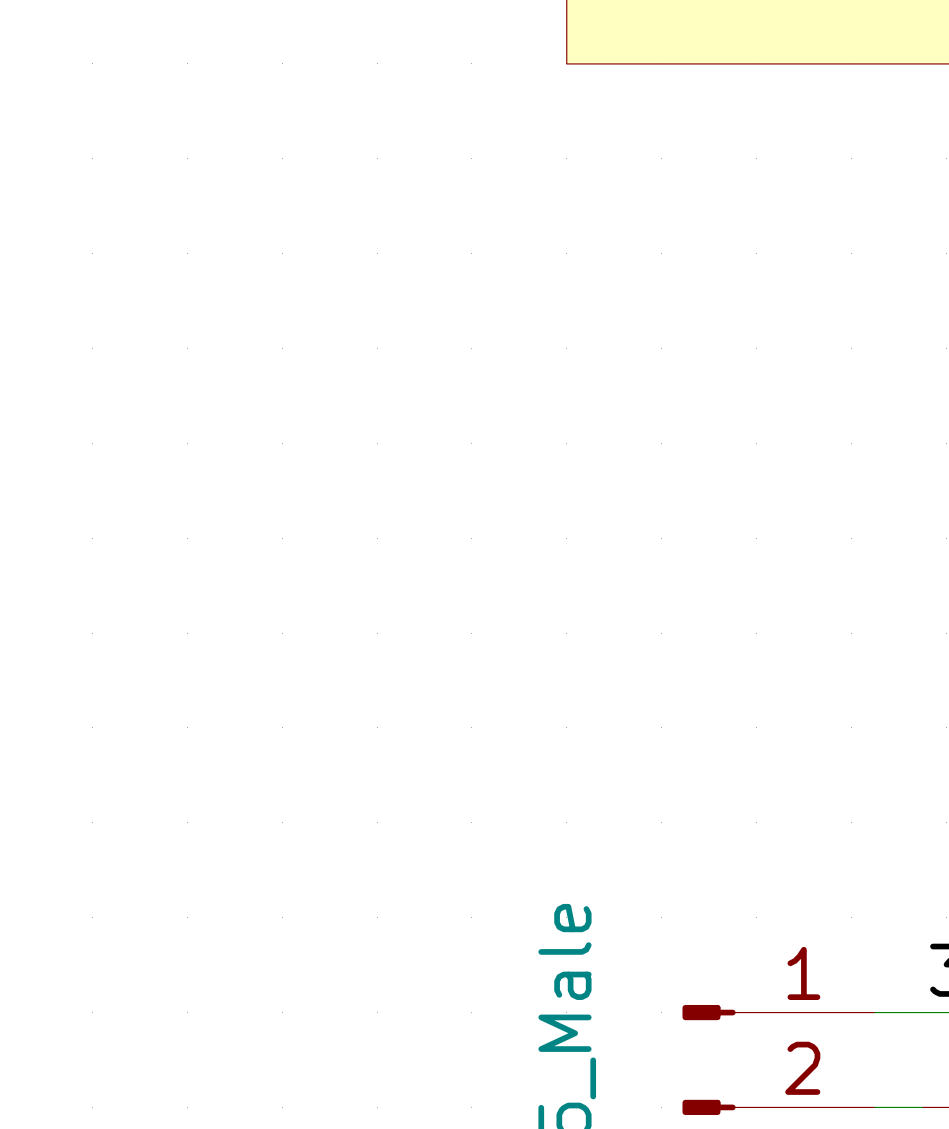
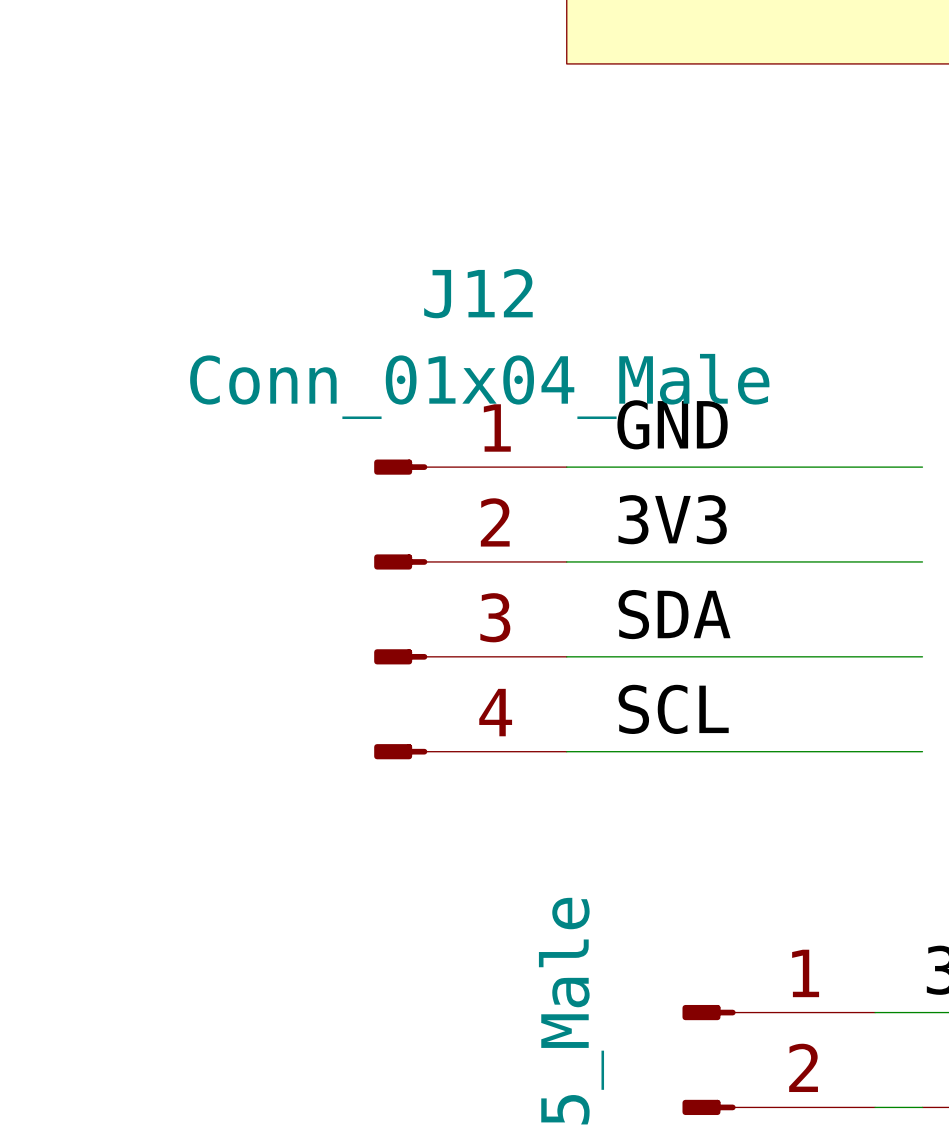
label: none -> GND (672, 424)
wire: none -> (566, 467) (922, 467)
label: none -> 3V3 (672, 519)
wire: none -> (566, 561) (922, 561)
J12: none -> Conn_01x04_Male (470, 609)
label: none -> SDA (674, 614)
wire: none -> (566, 656) (922, 656)
label: none -> SCL (673, 709)
wire: none -> (566, 751) (922, 751)

